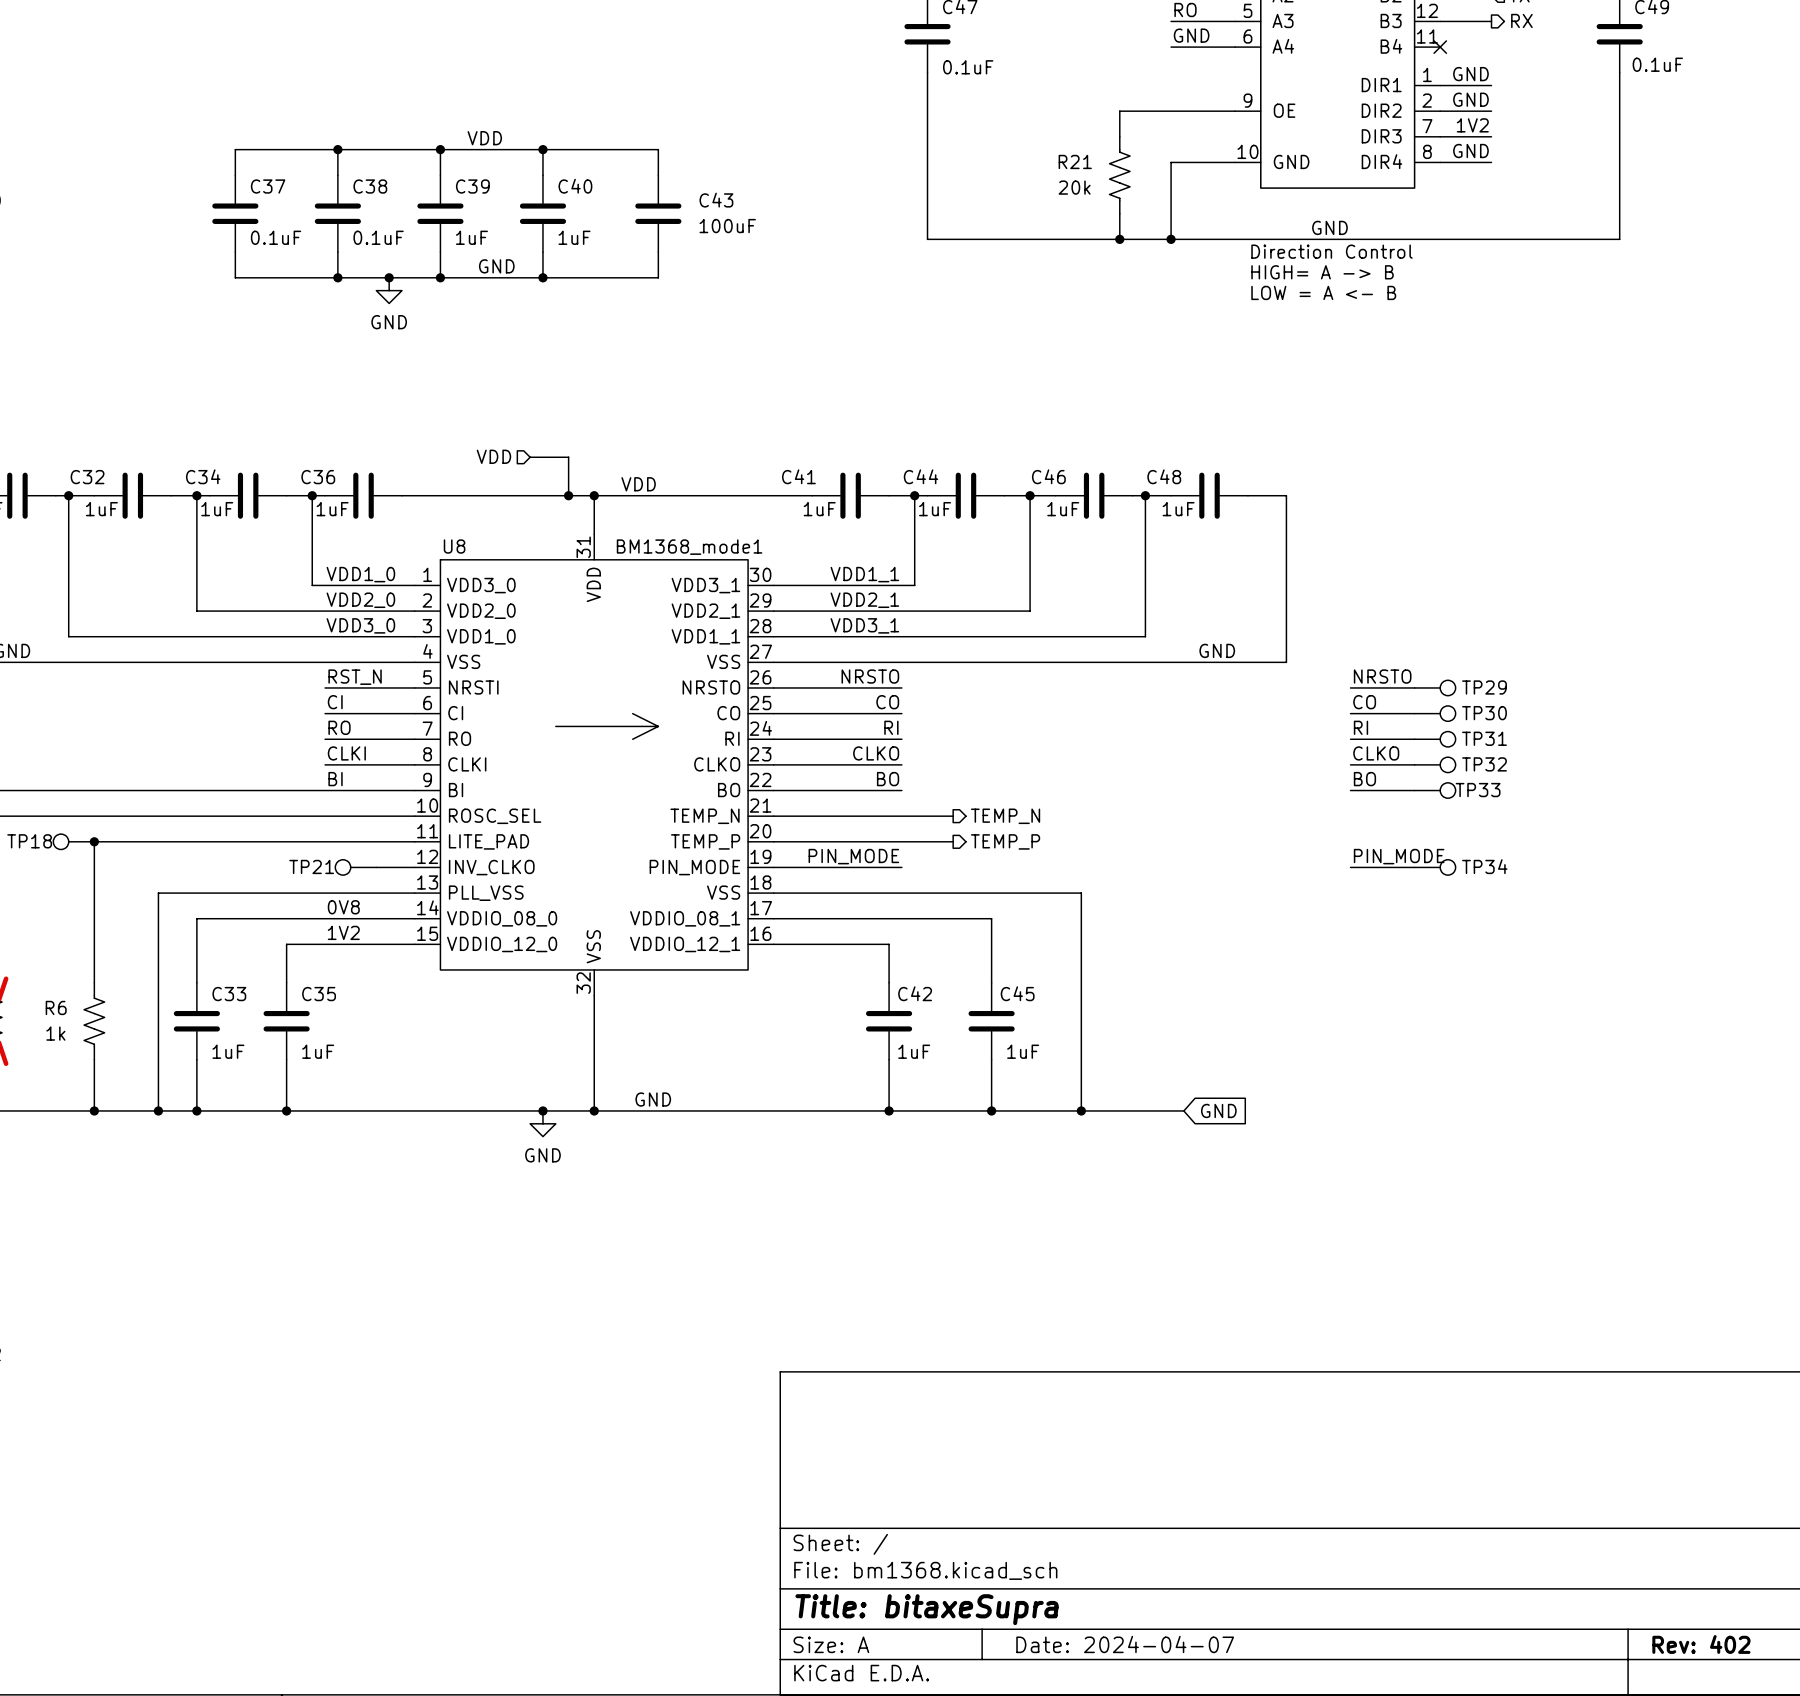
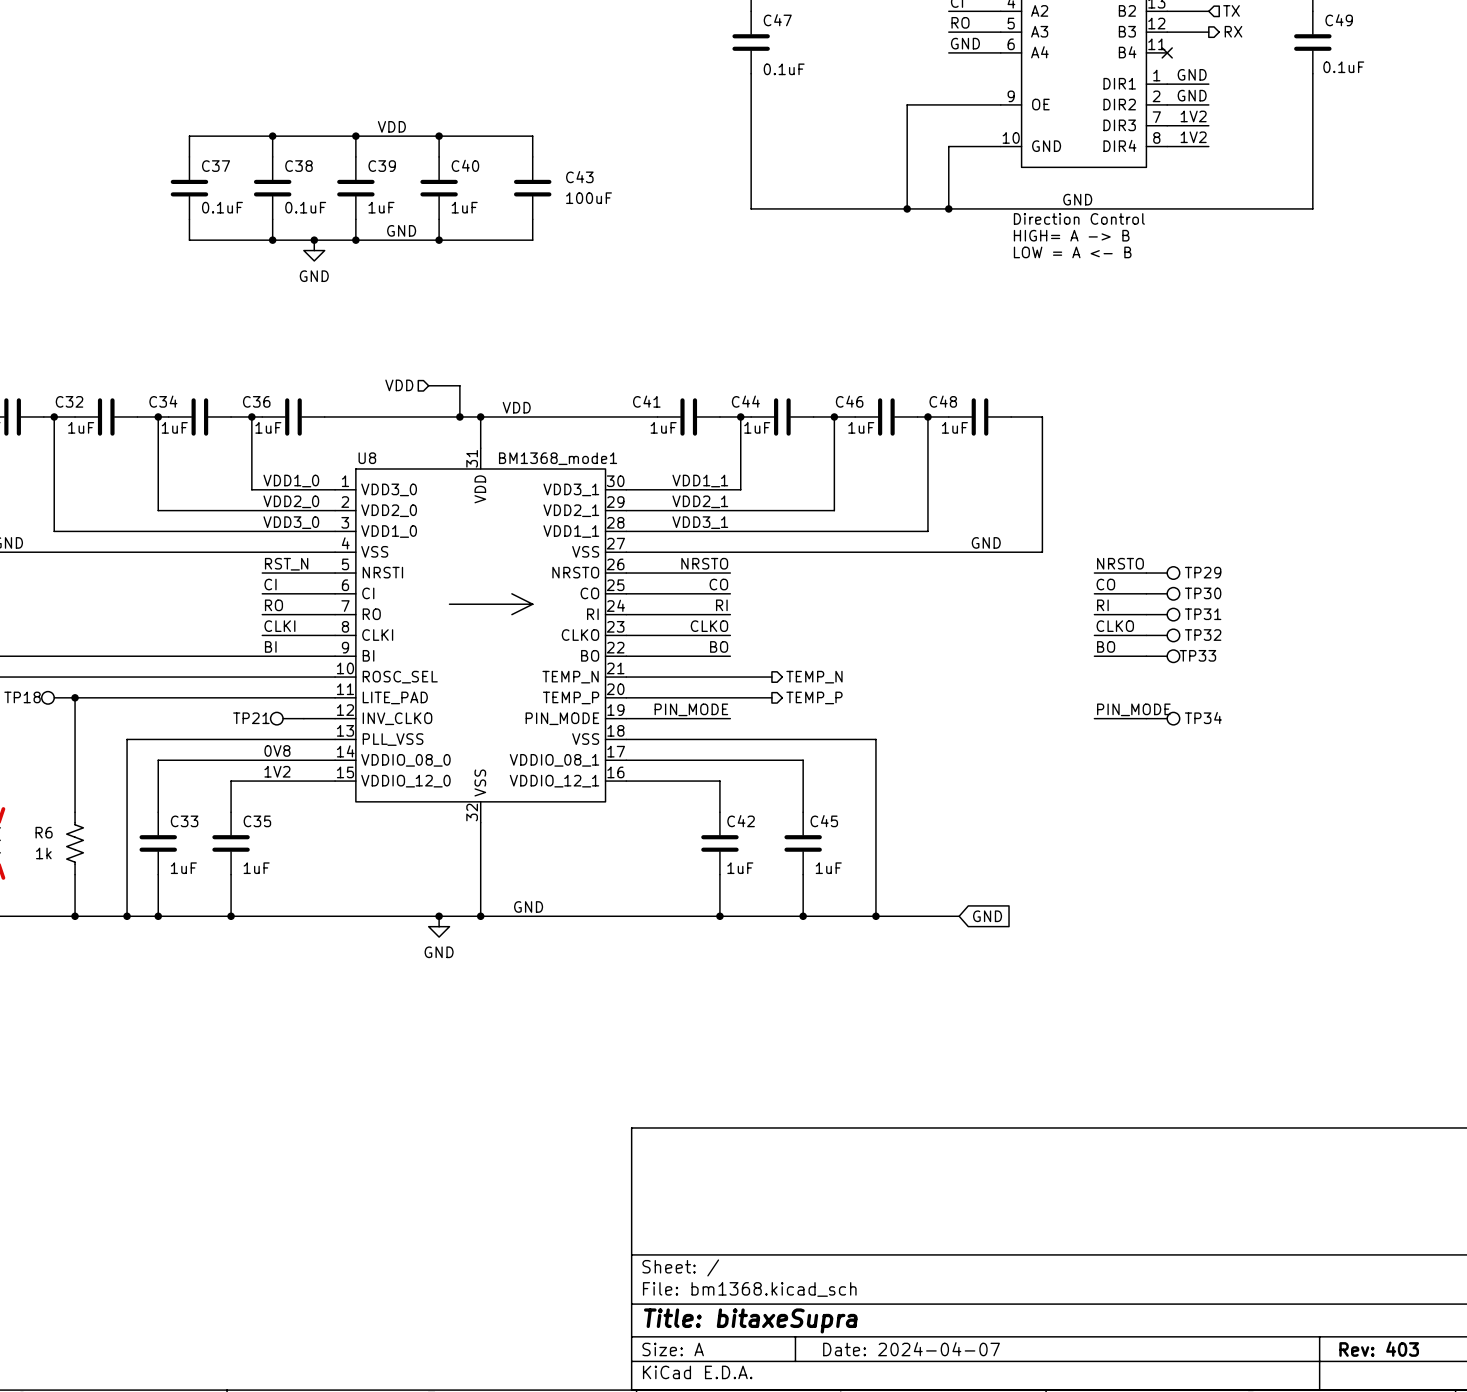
label: GND (1470, 151) -> 1V2 (1193, 137)
R21: 20k (1119, 175) -> none
title block: Rev: 402 (1701, 1644) -> Rev: 403 (1379, 1349)

